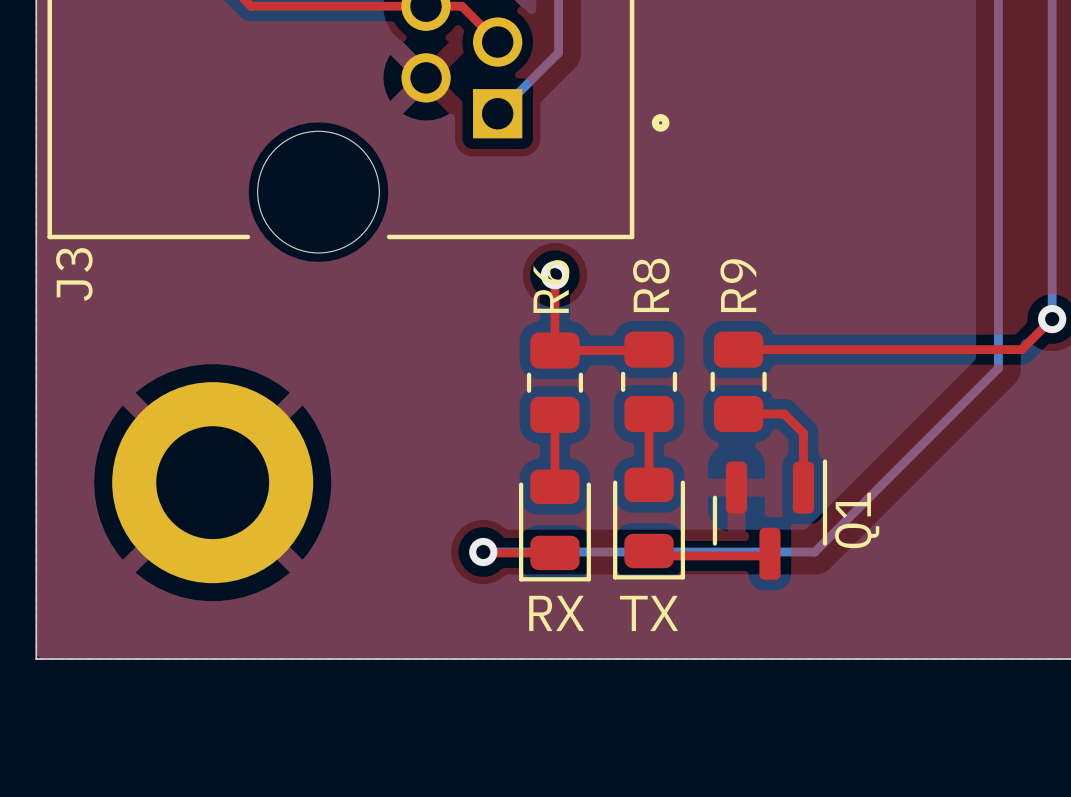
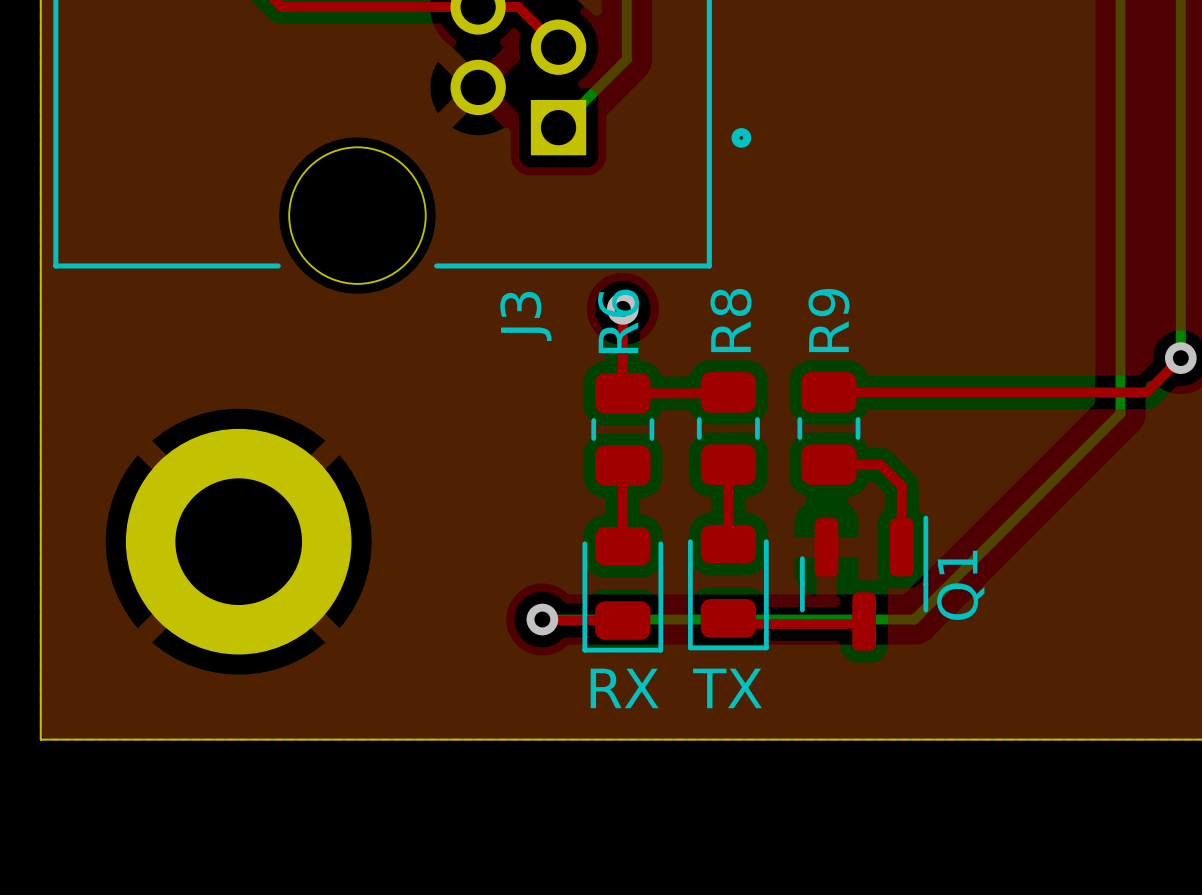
J3 name position: J3 (74, 274) -> J3 (525, 316)

